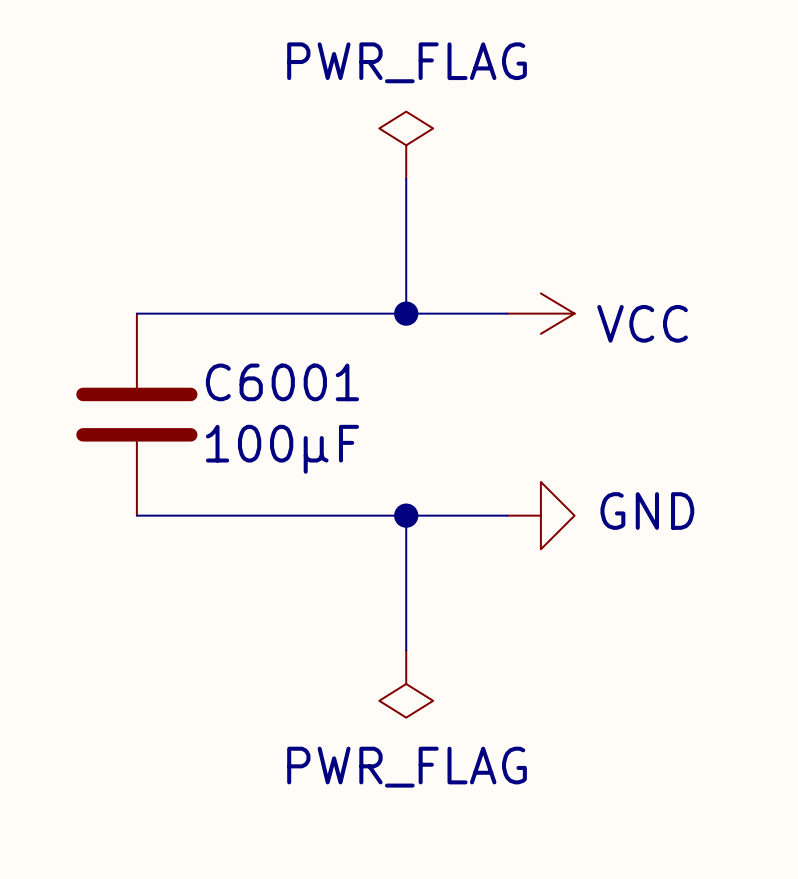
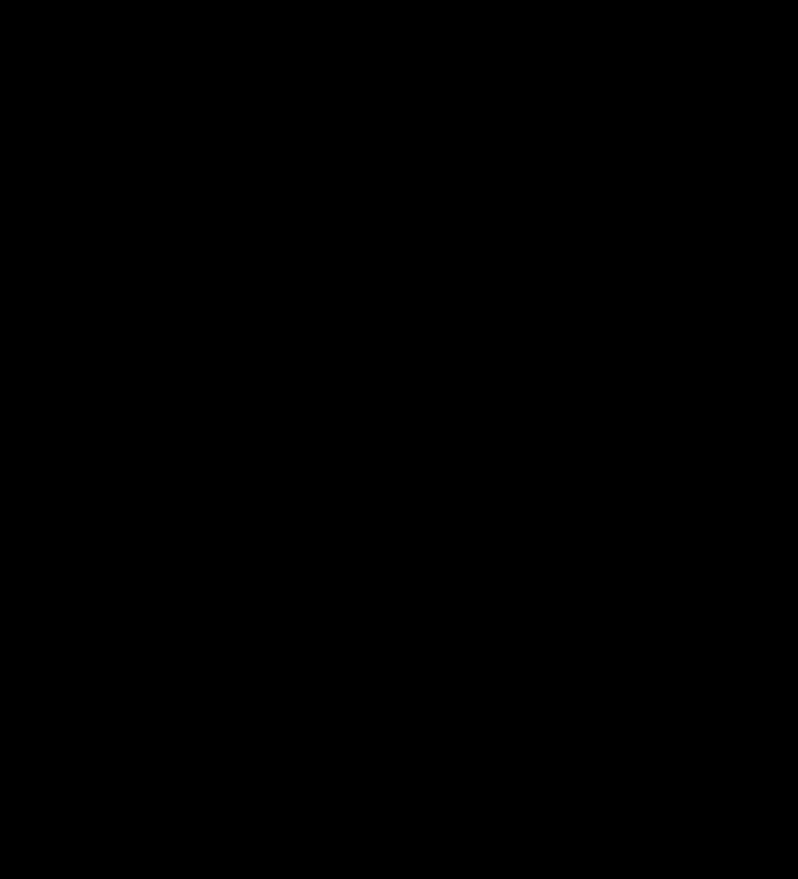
power symbol: PWR_FLAG (406, 145) -> none
wire: (406, 178) (406, 313) -> none
wire: (136, 313) (507, 313) -> none
junction: (406, 313) -> none
power symbol: VCC (540, 313) -> none
C6001: 100µF (136, 414) -> none
wire: (136, 515) (507, 515) -> none
wire: (406, 515) (406, 650) -> none
junction: (406, 515) -> none
power symbol: GND (540, 515) -> none
power symbol: PWR_FLAG (406, 683) -> none

